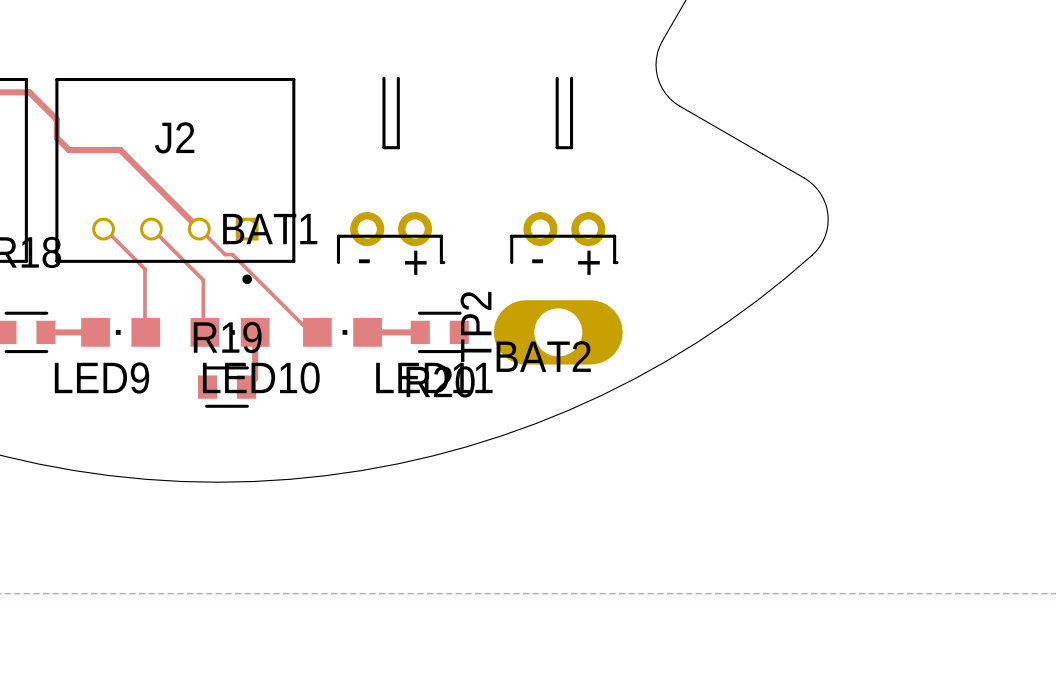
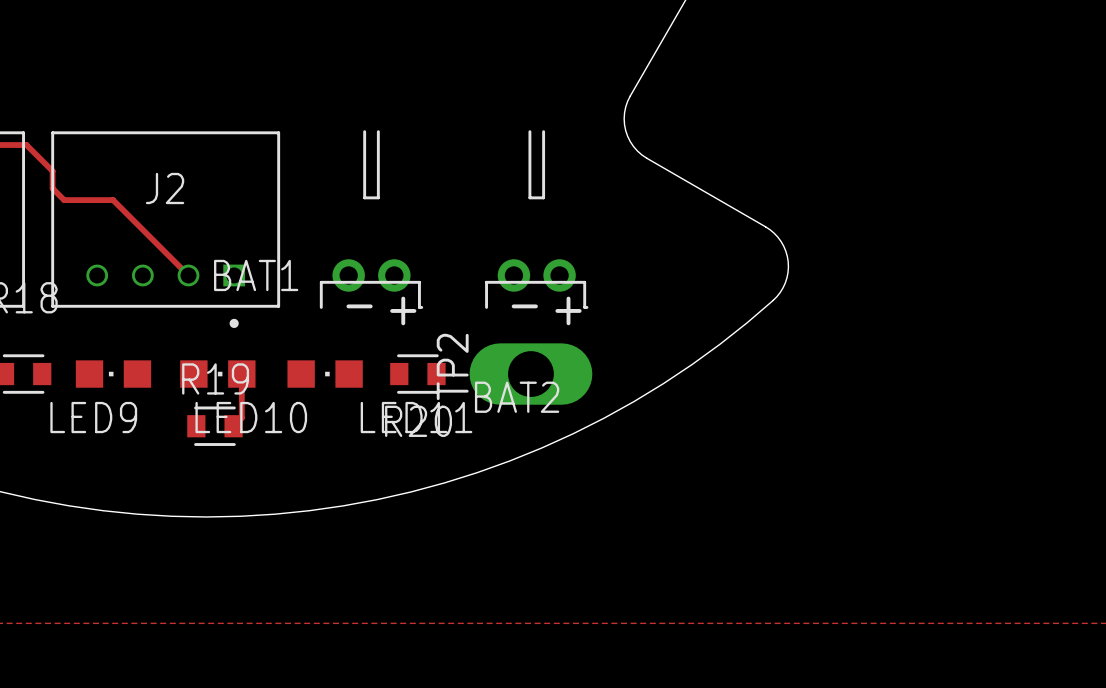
track: (103, 229) (144, 269) (145, 332) -> none
track: (151, 229) (203, 280) (203, 331) (204, 332) -> none
track: (199, 229) (225, 254) (232, 254) (309, 331) (317, 332) -> none
track: (45, 332) (95, 332) -> none
track: (367, 332) (420, 332) -> none

